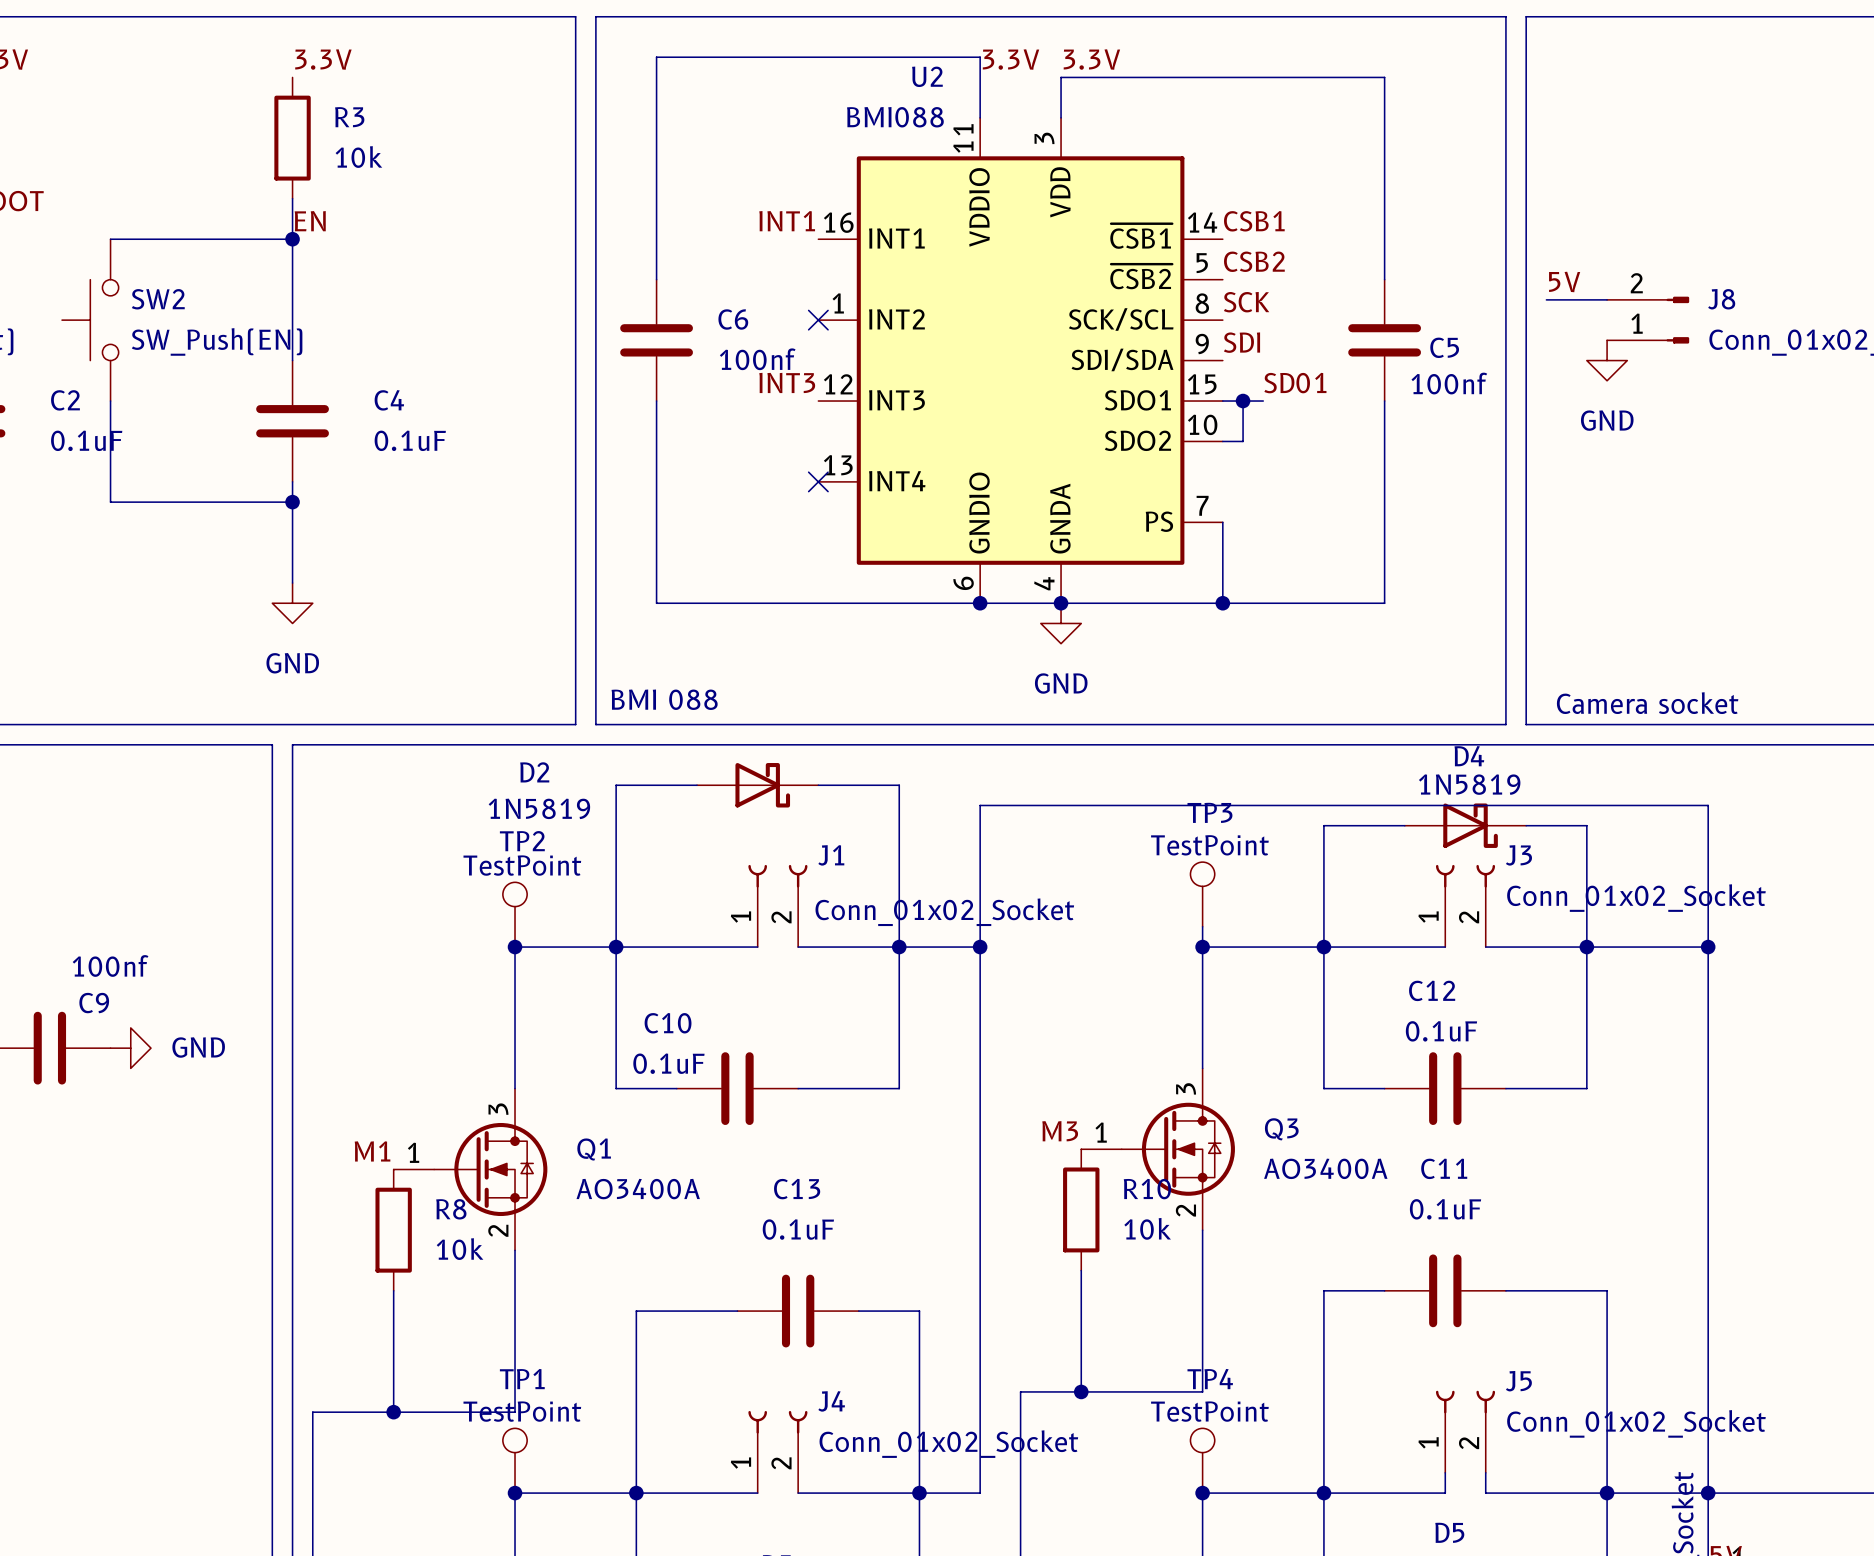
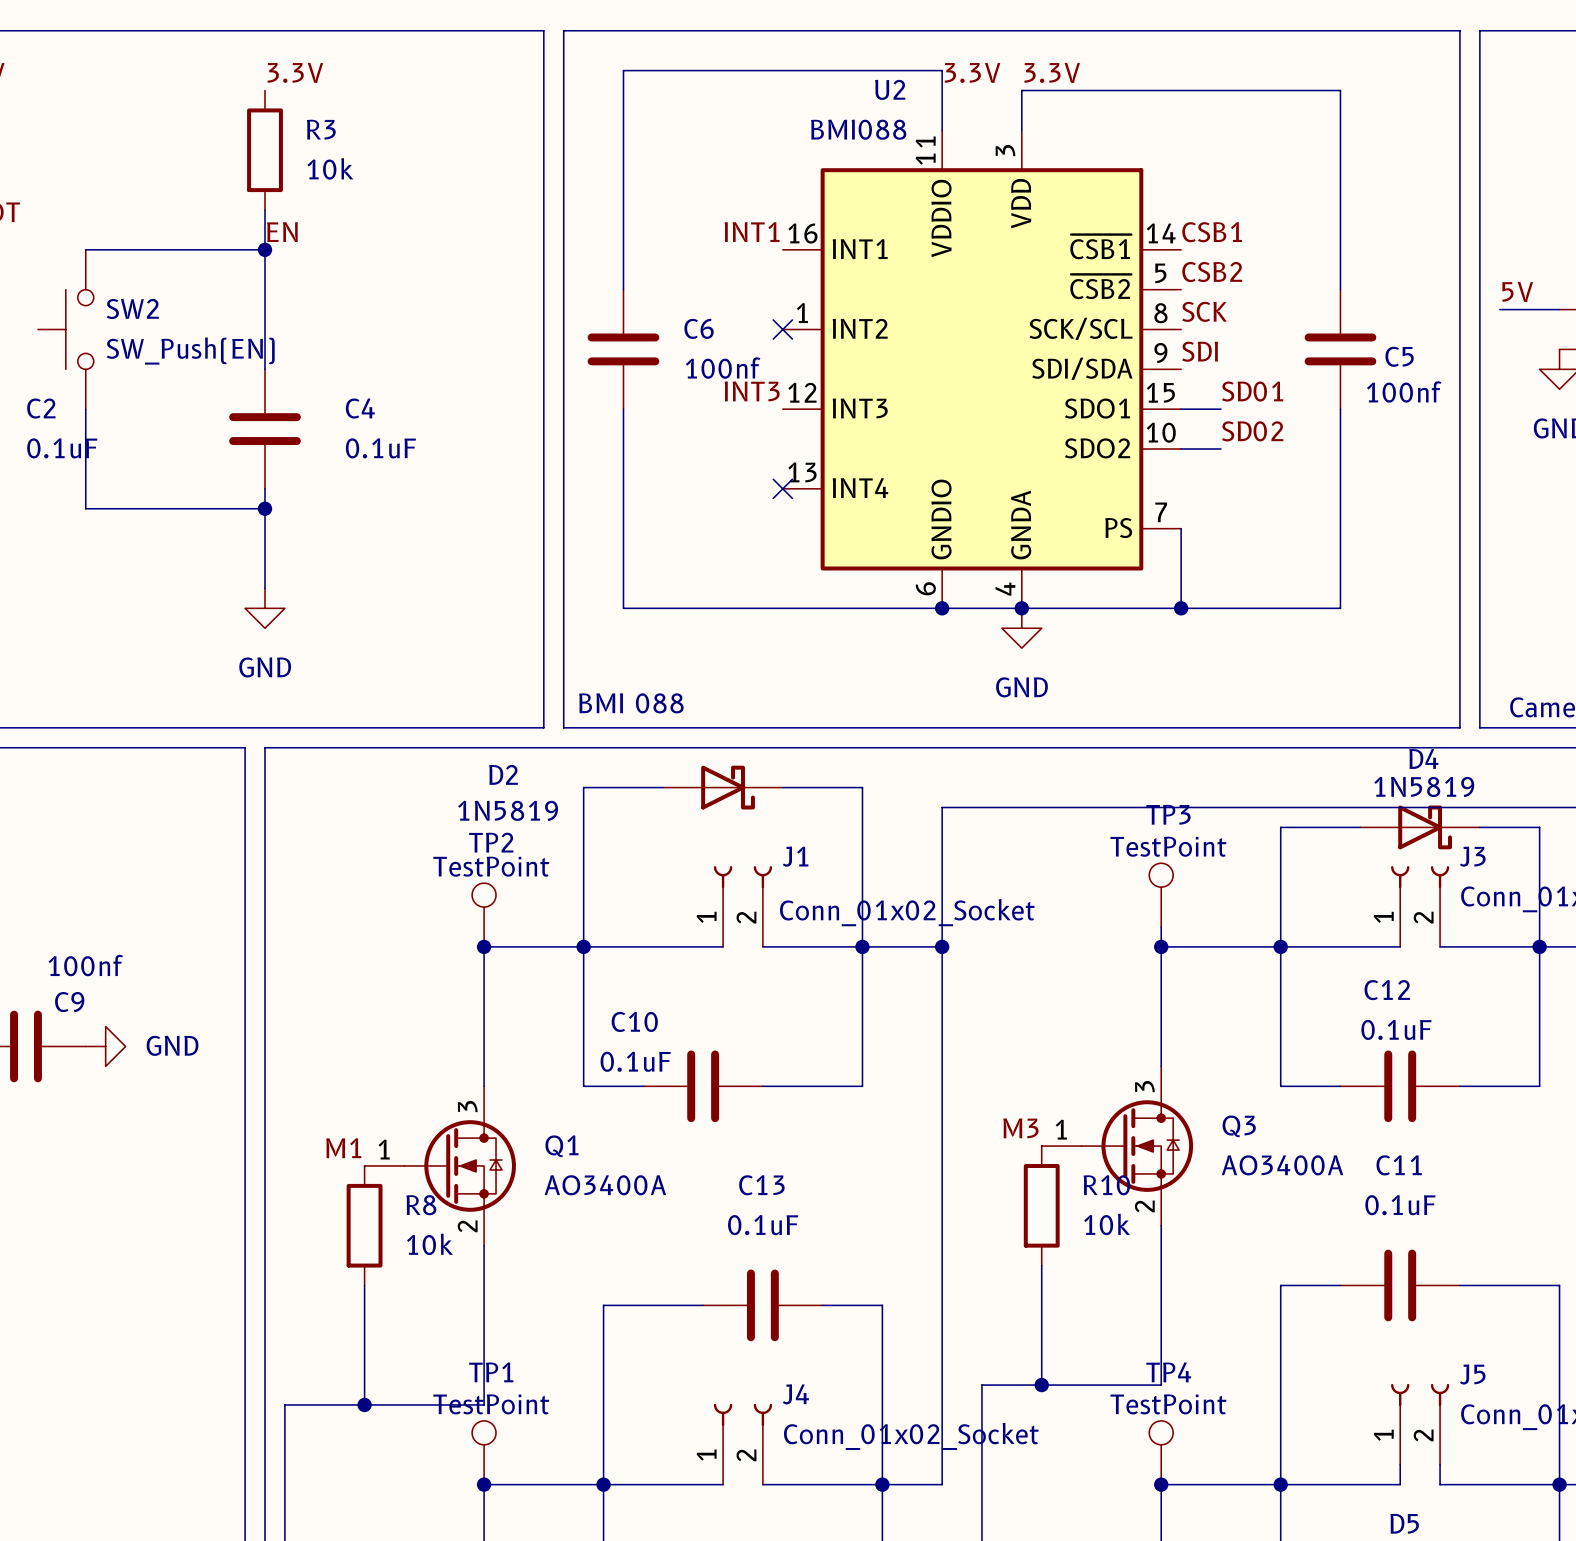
wire: (1243, 401) (1243, 441) -> (1220, 449) (1201, 449)
junction: (1243, 401) -> none
label: none -> SD02 (1252, 431)

